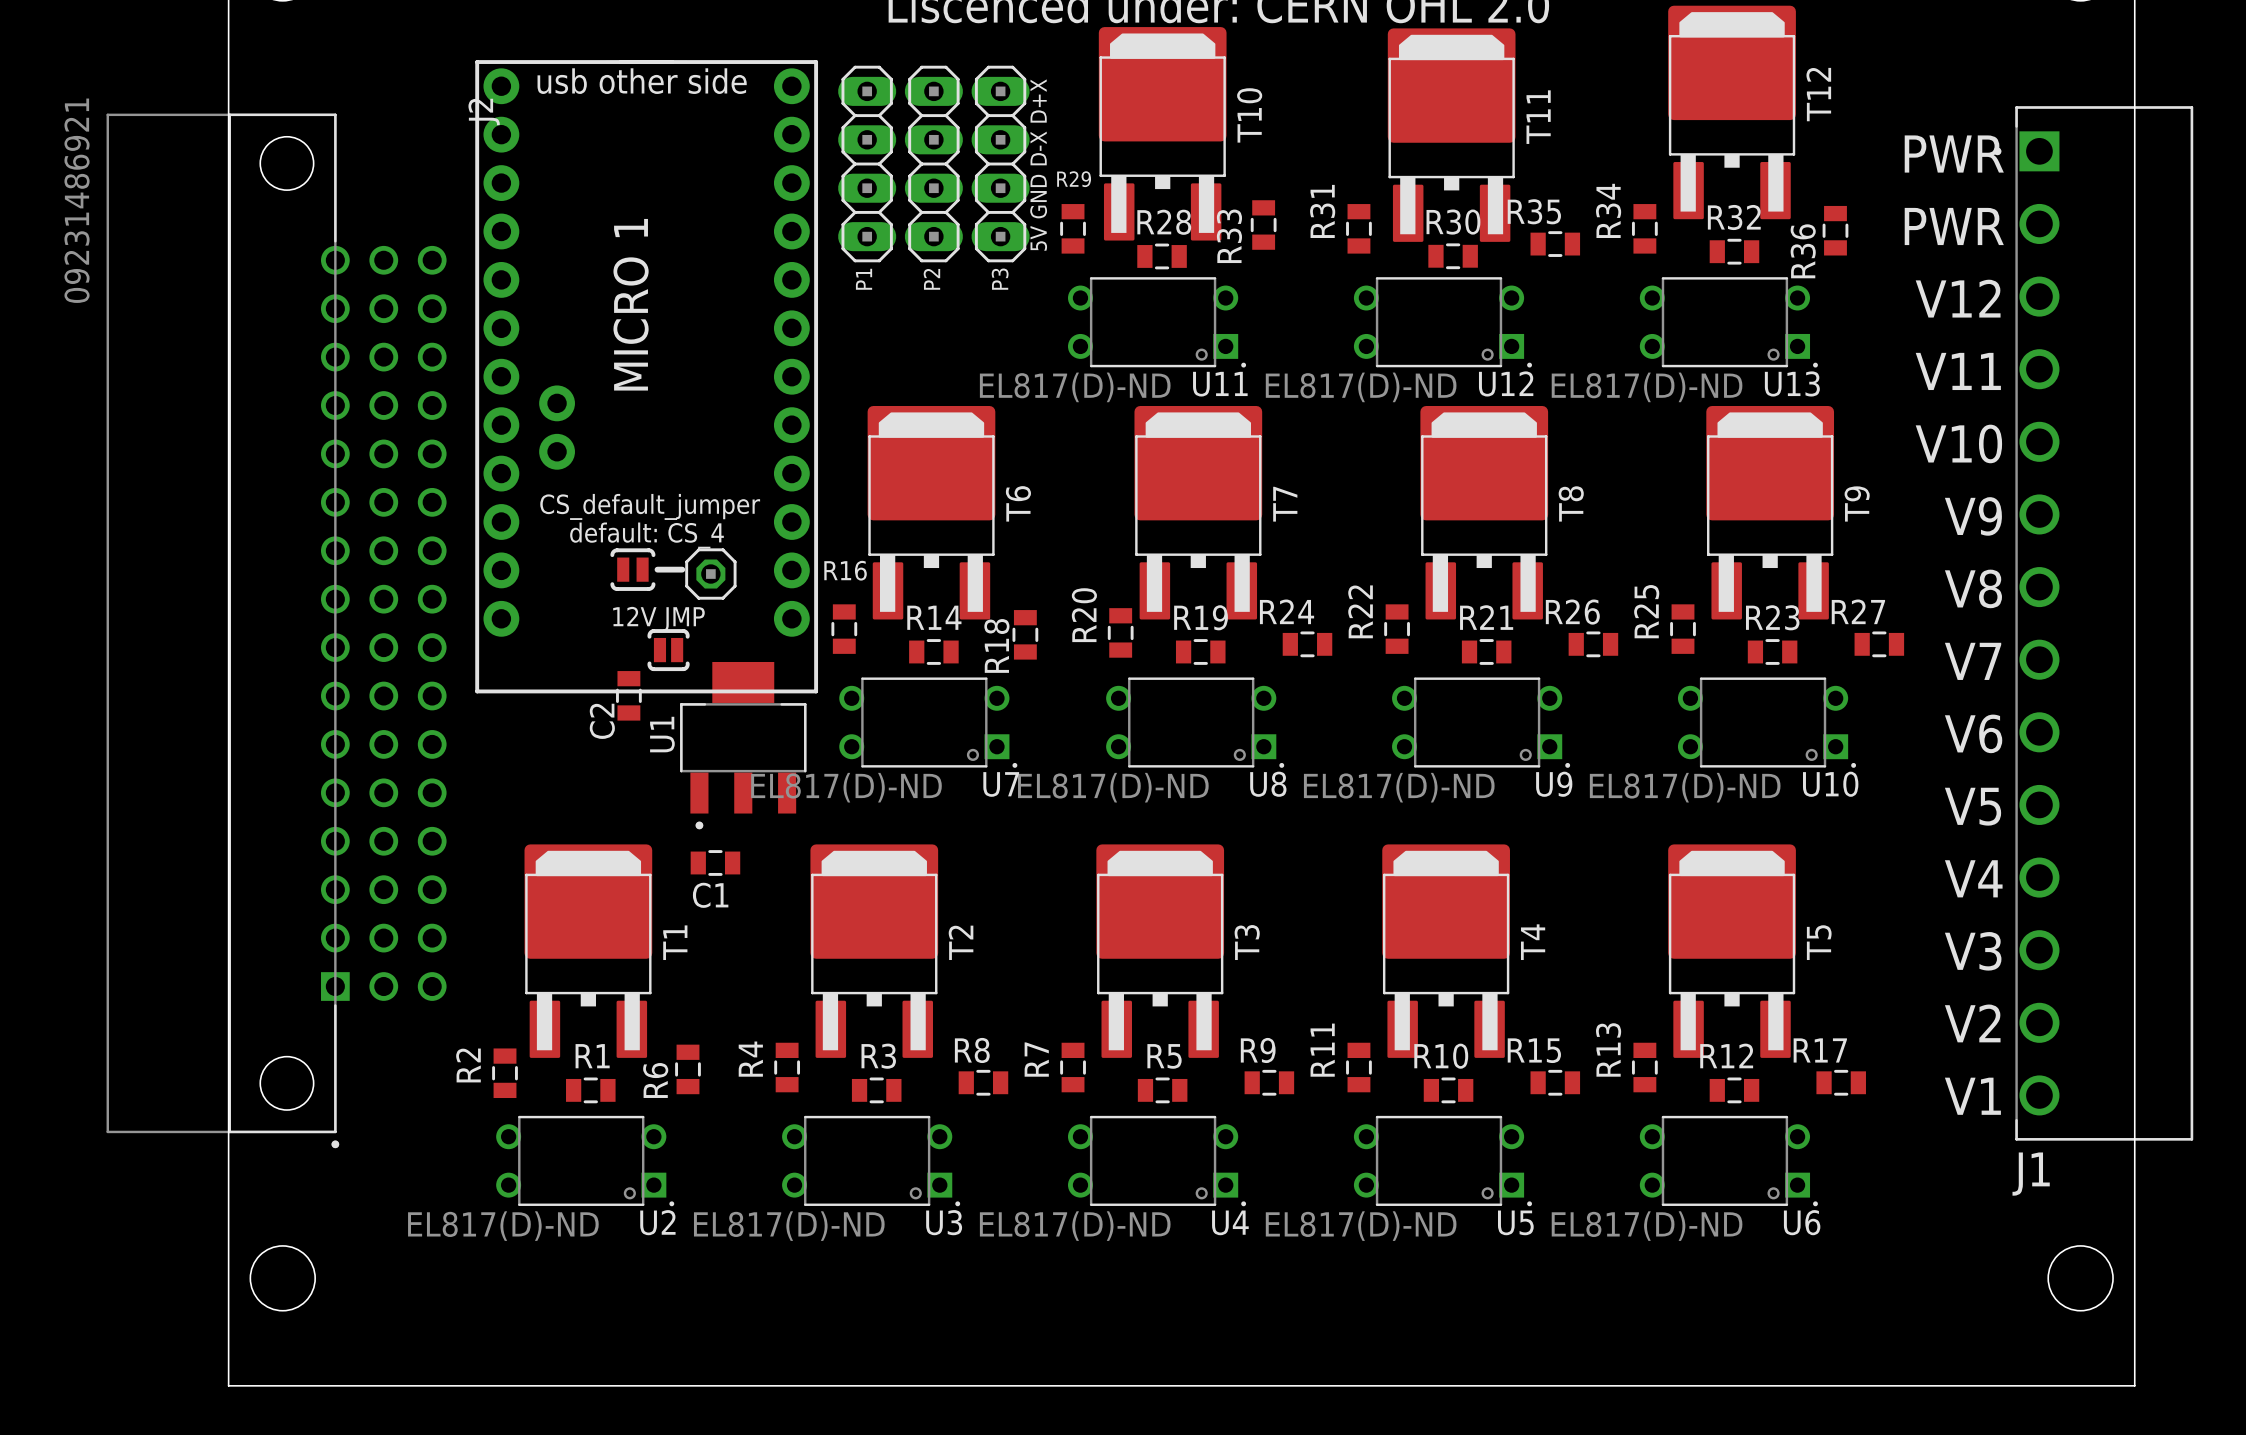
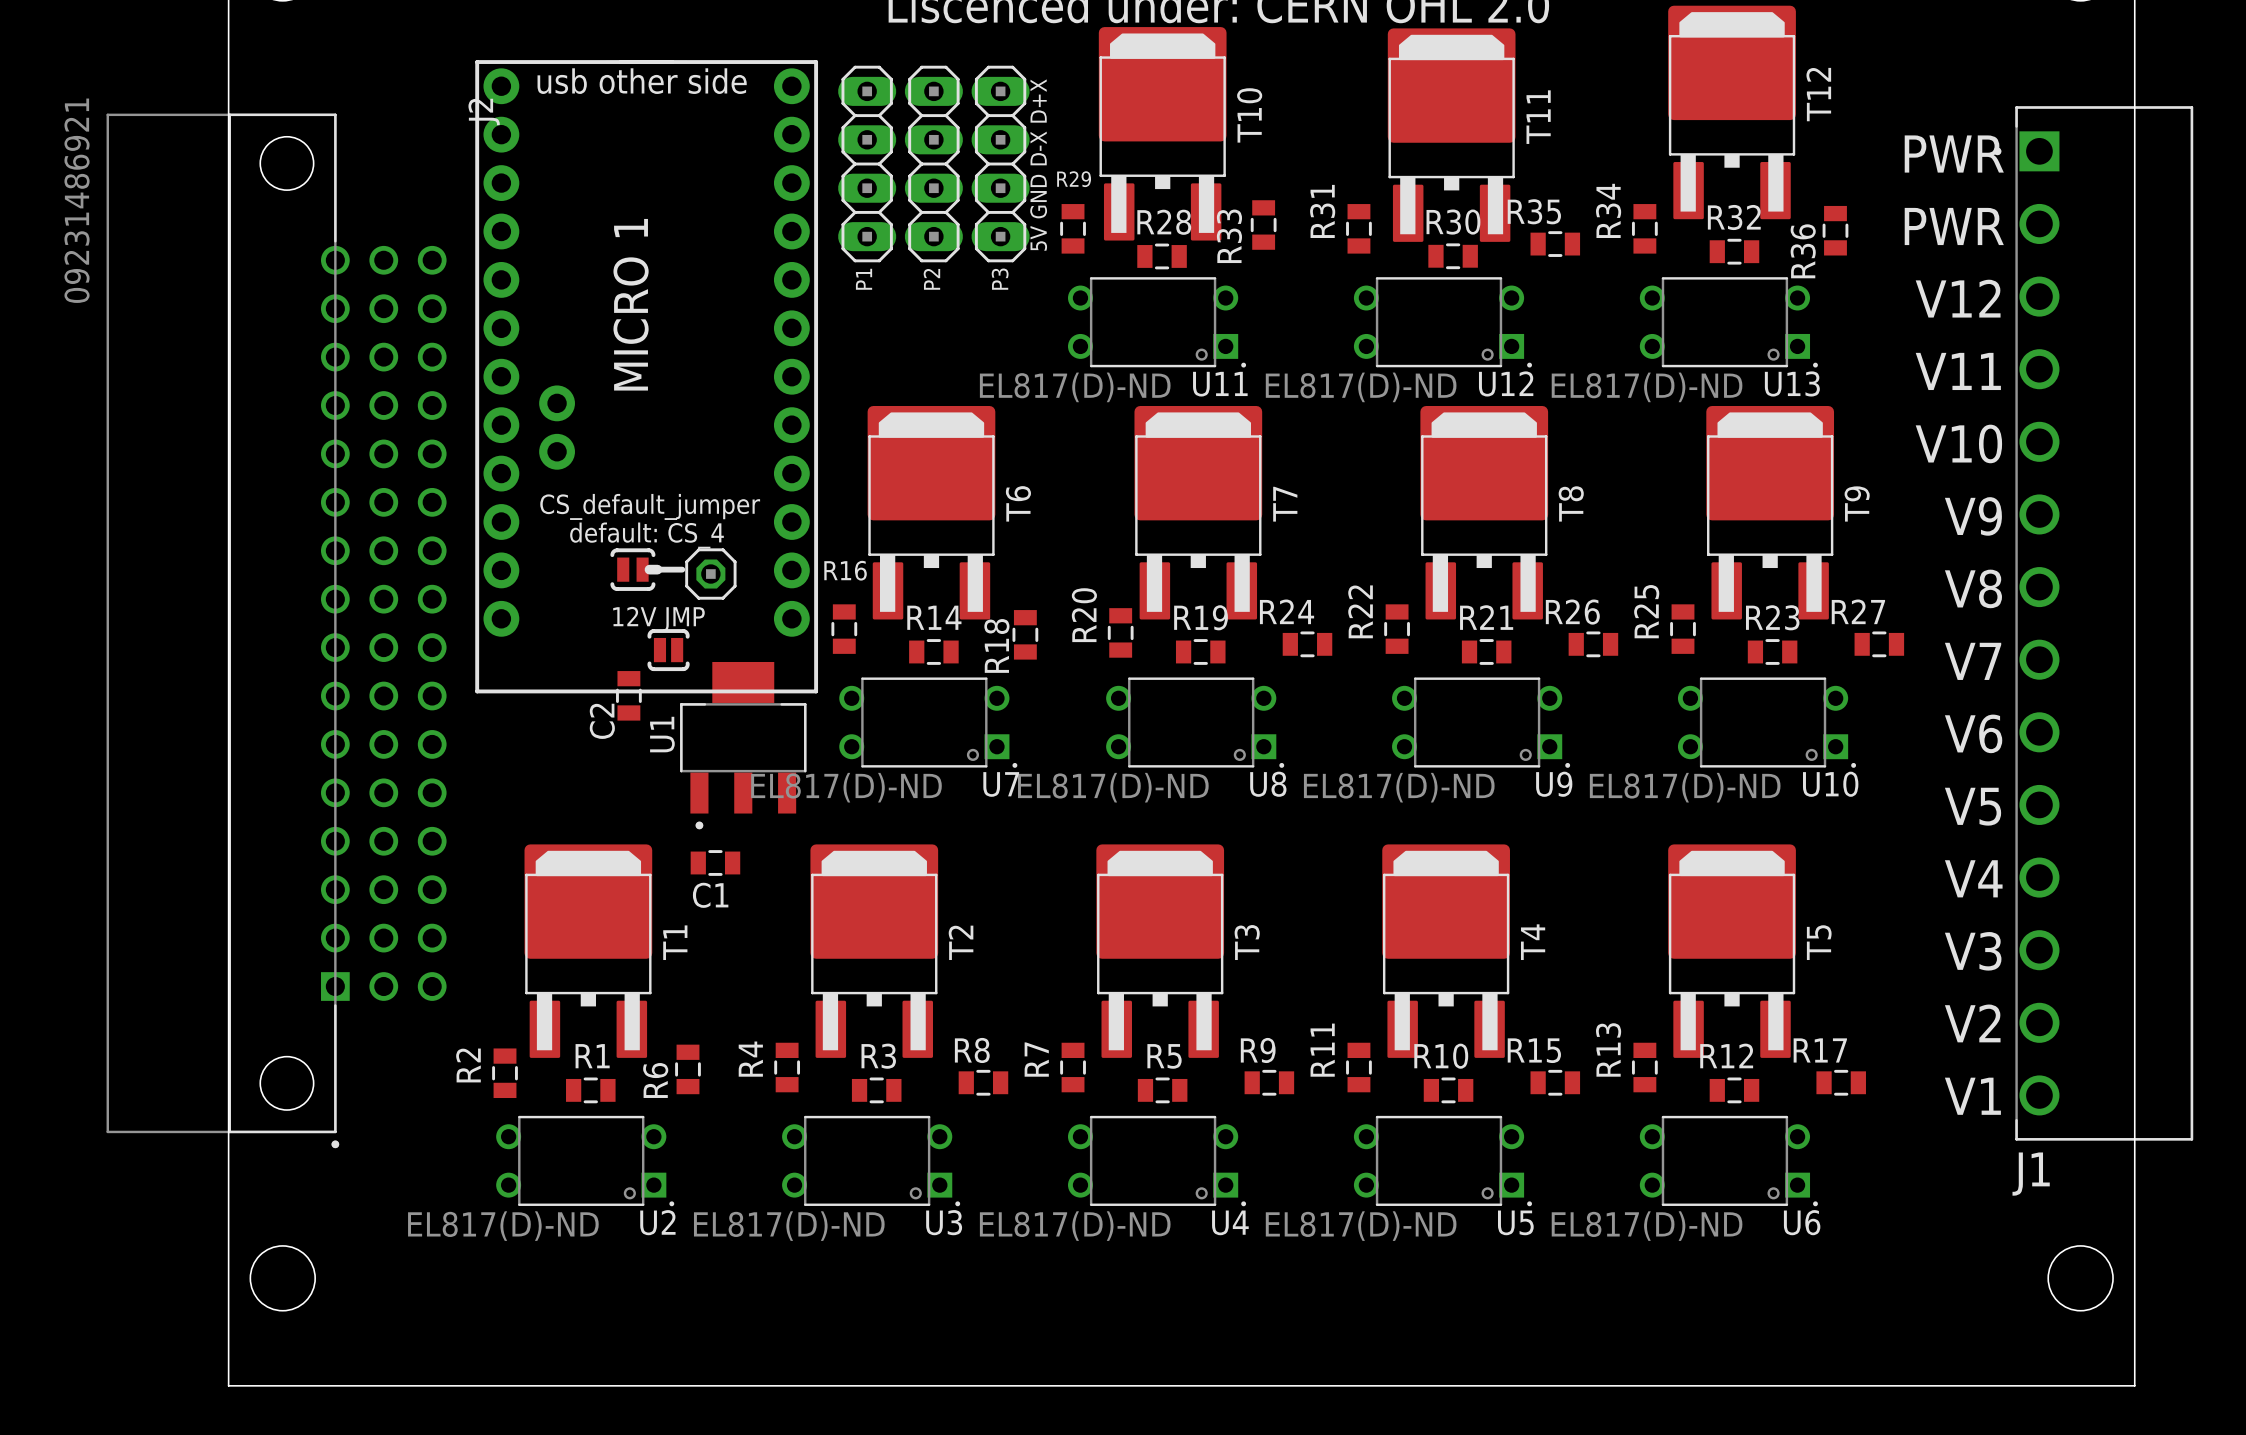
line: none -> (649, 569) (657, 569)

